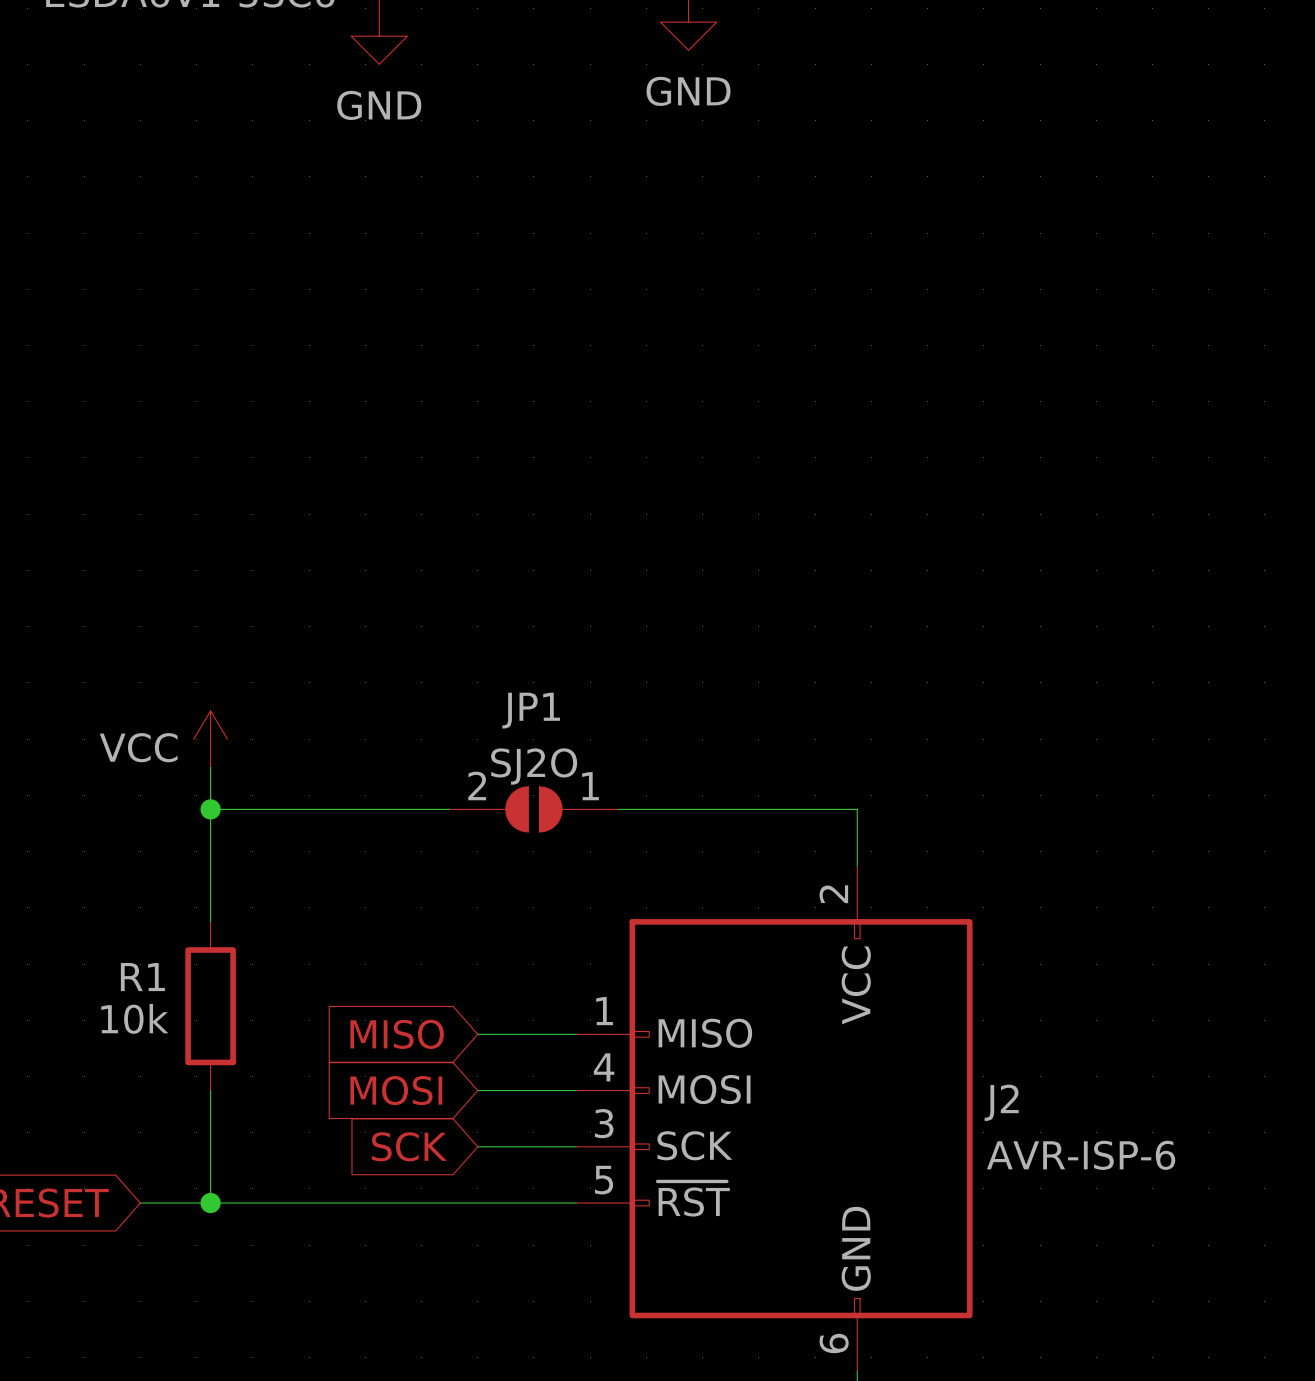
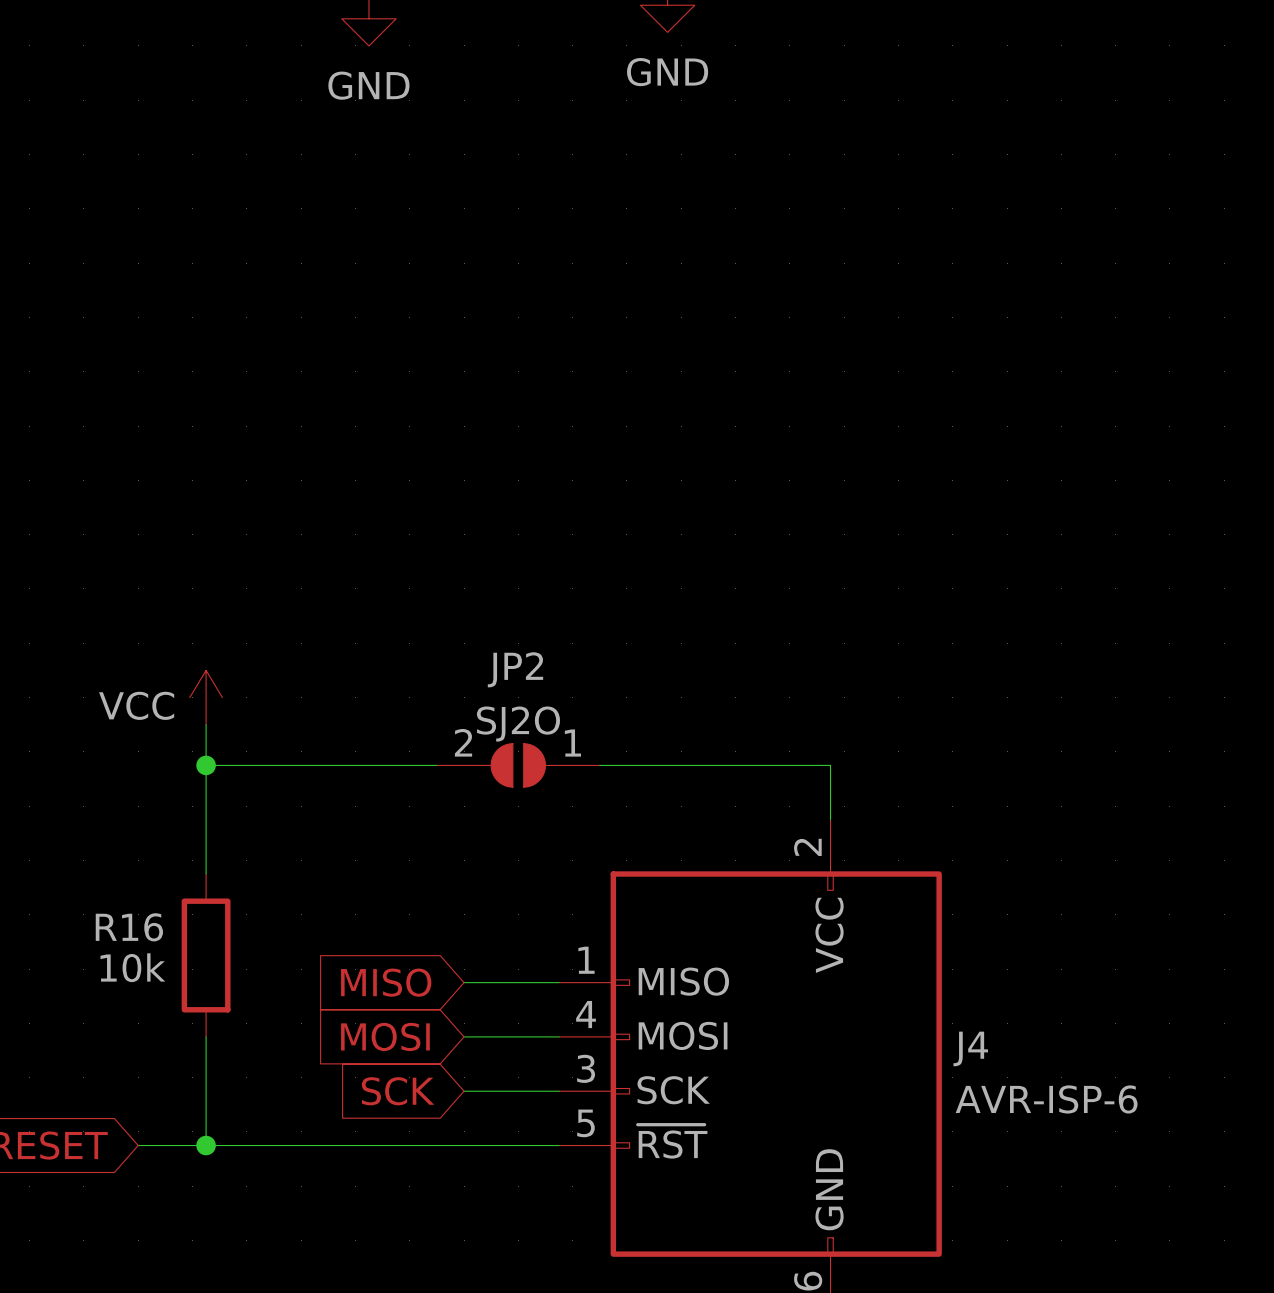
JP1 name: JP1 (531, 710) -> JP2 (515, 669)
R1 name: R1 (142, 977) -> R16 (129, 927)
J2 name: J2 (1001, 1102) -> J4 (970, 1048)

